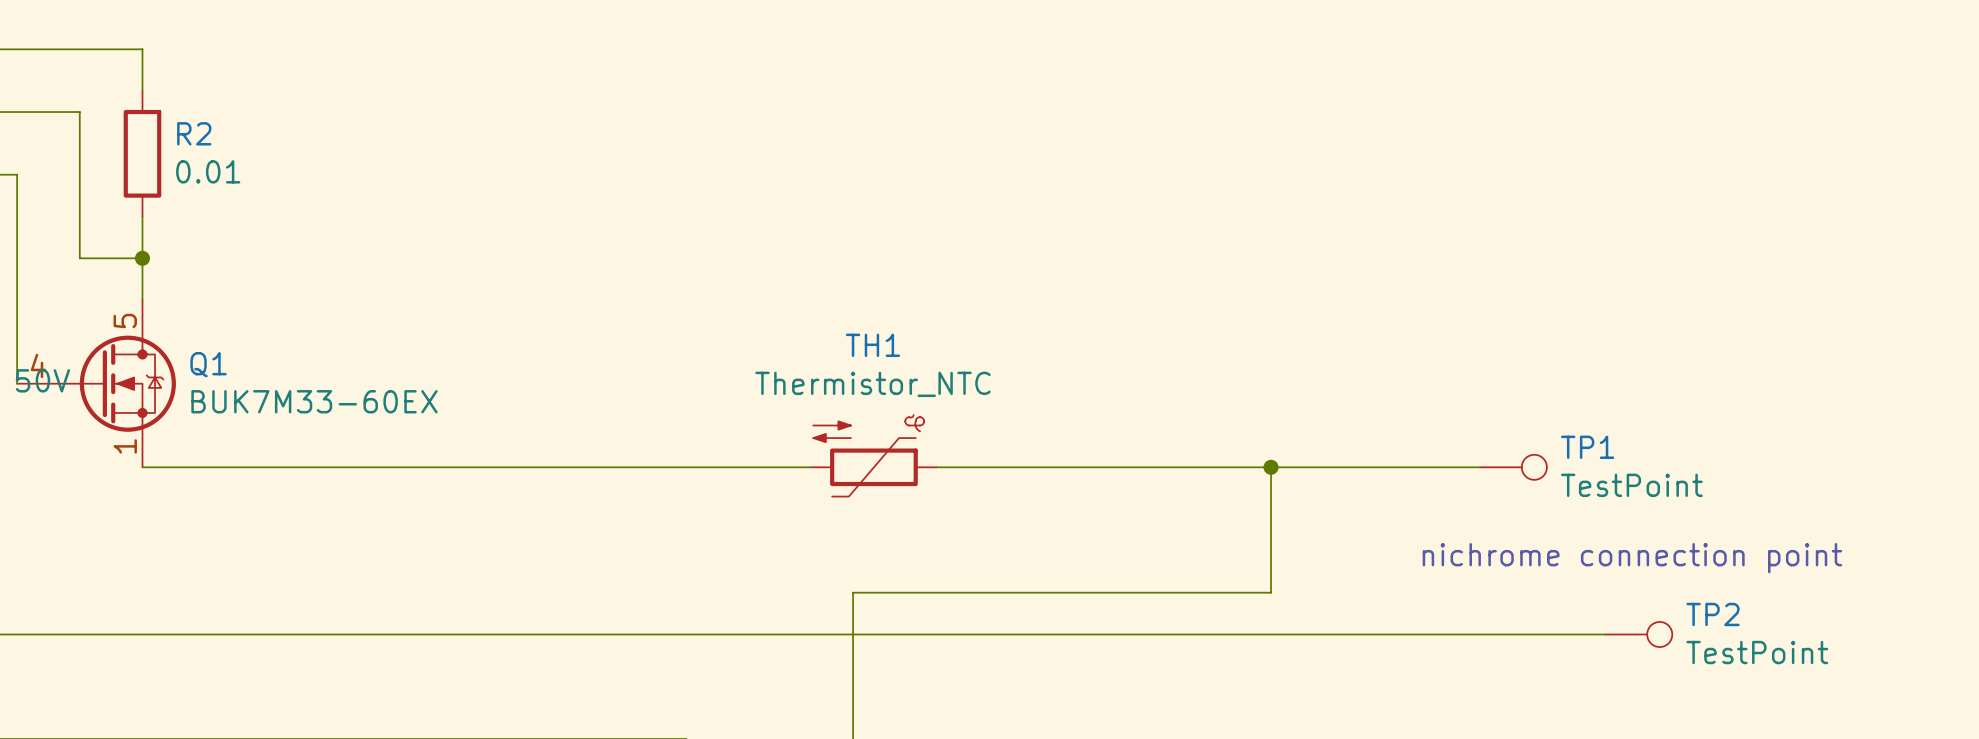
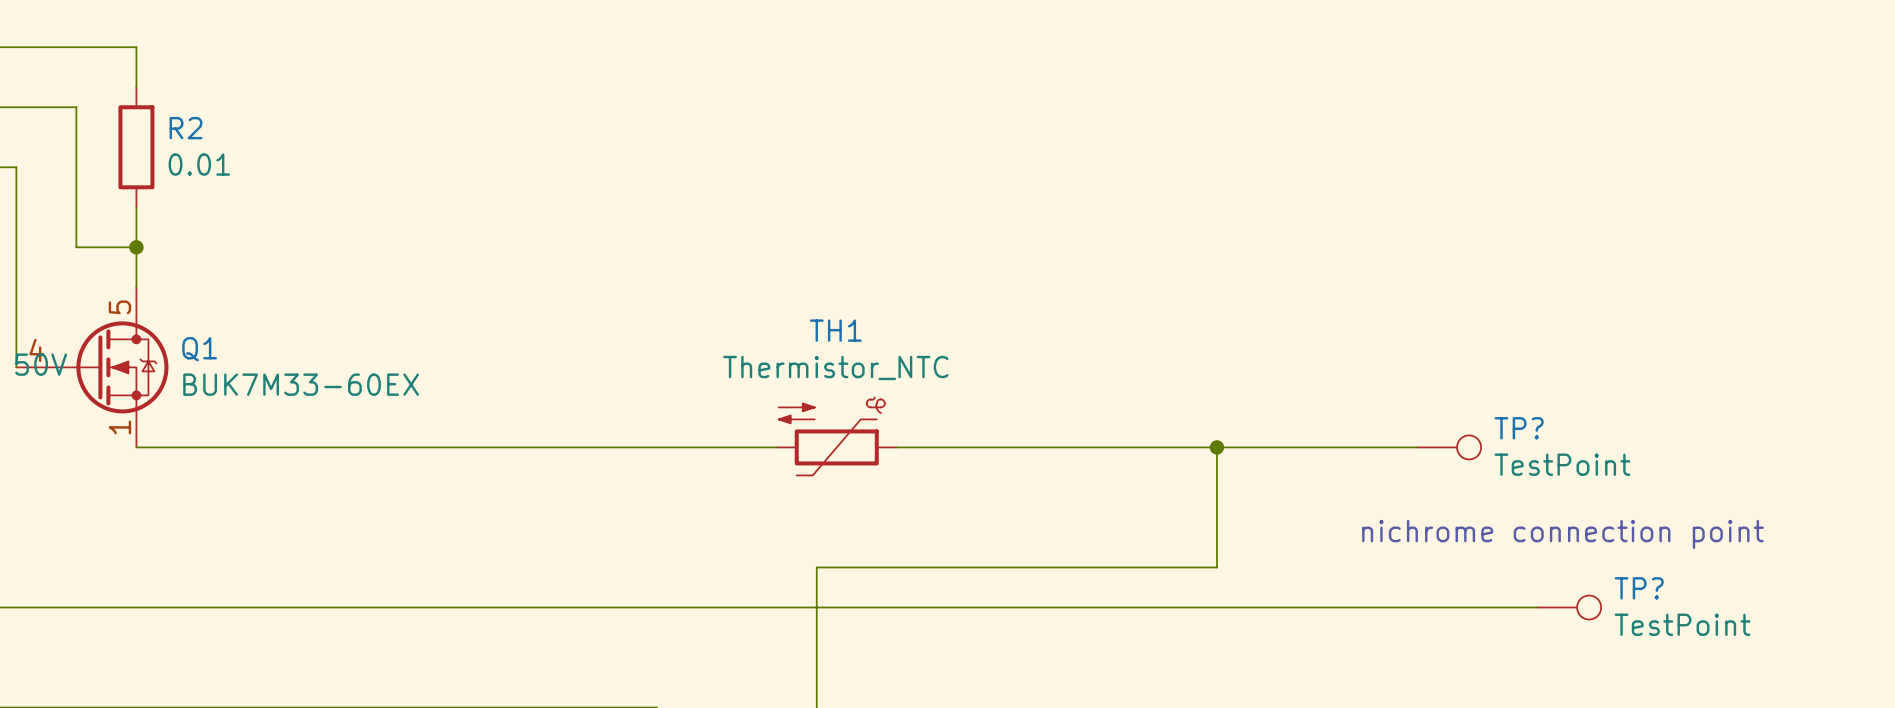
TP1 name: TP1 (1587, 447) -> TP? (1519, 428)
TP2 name: TP2 (1713, 614) -> TP? (1639, 588)

